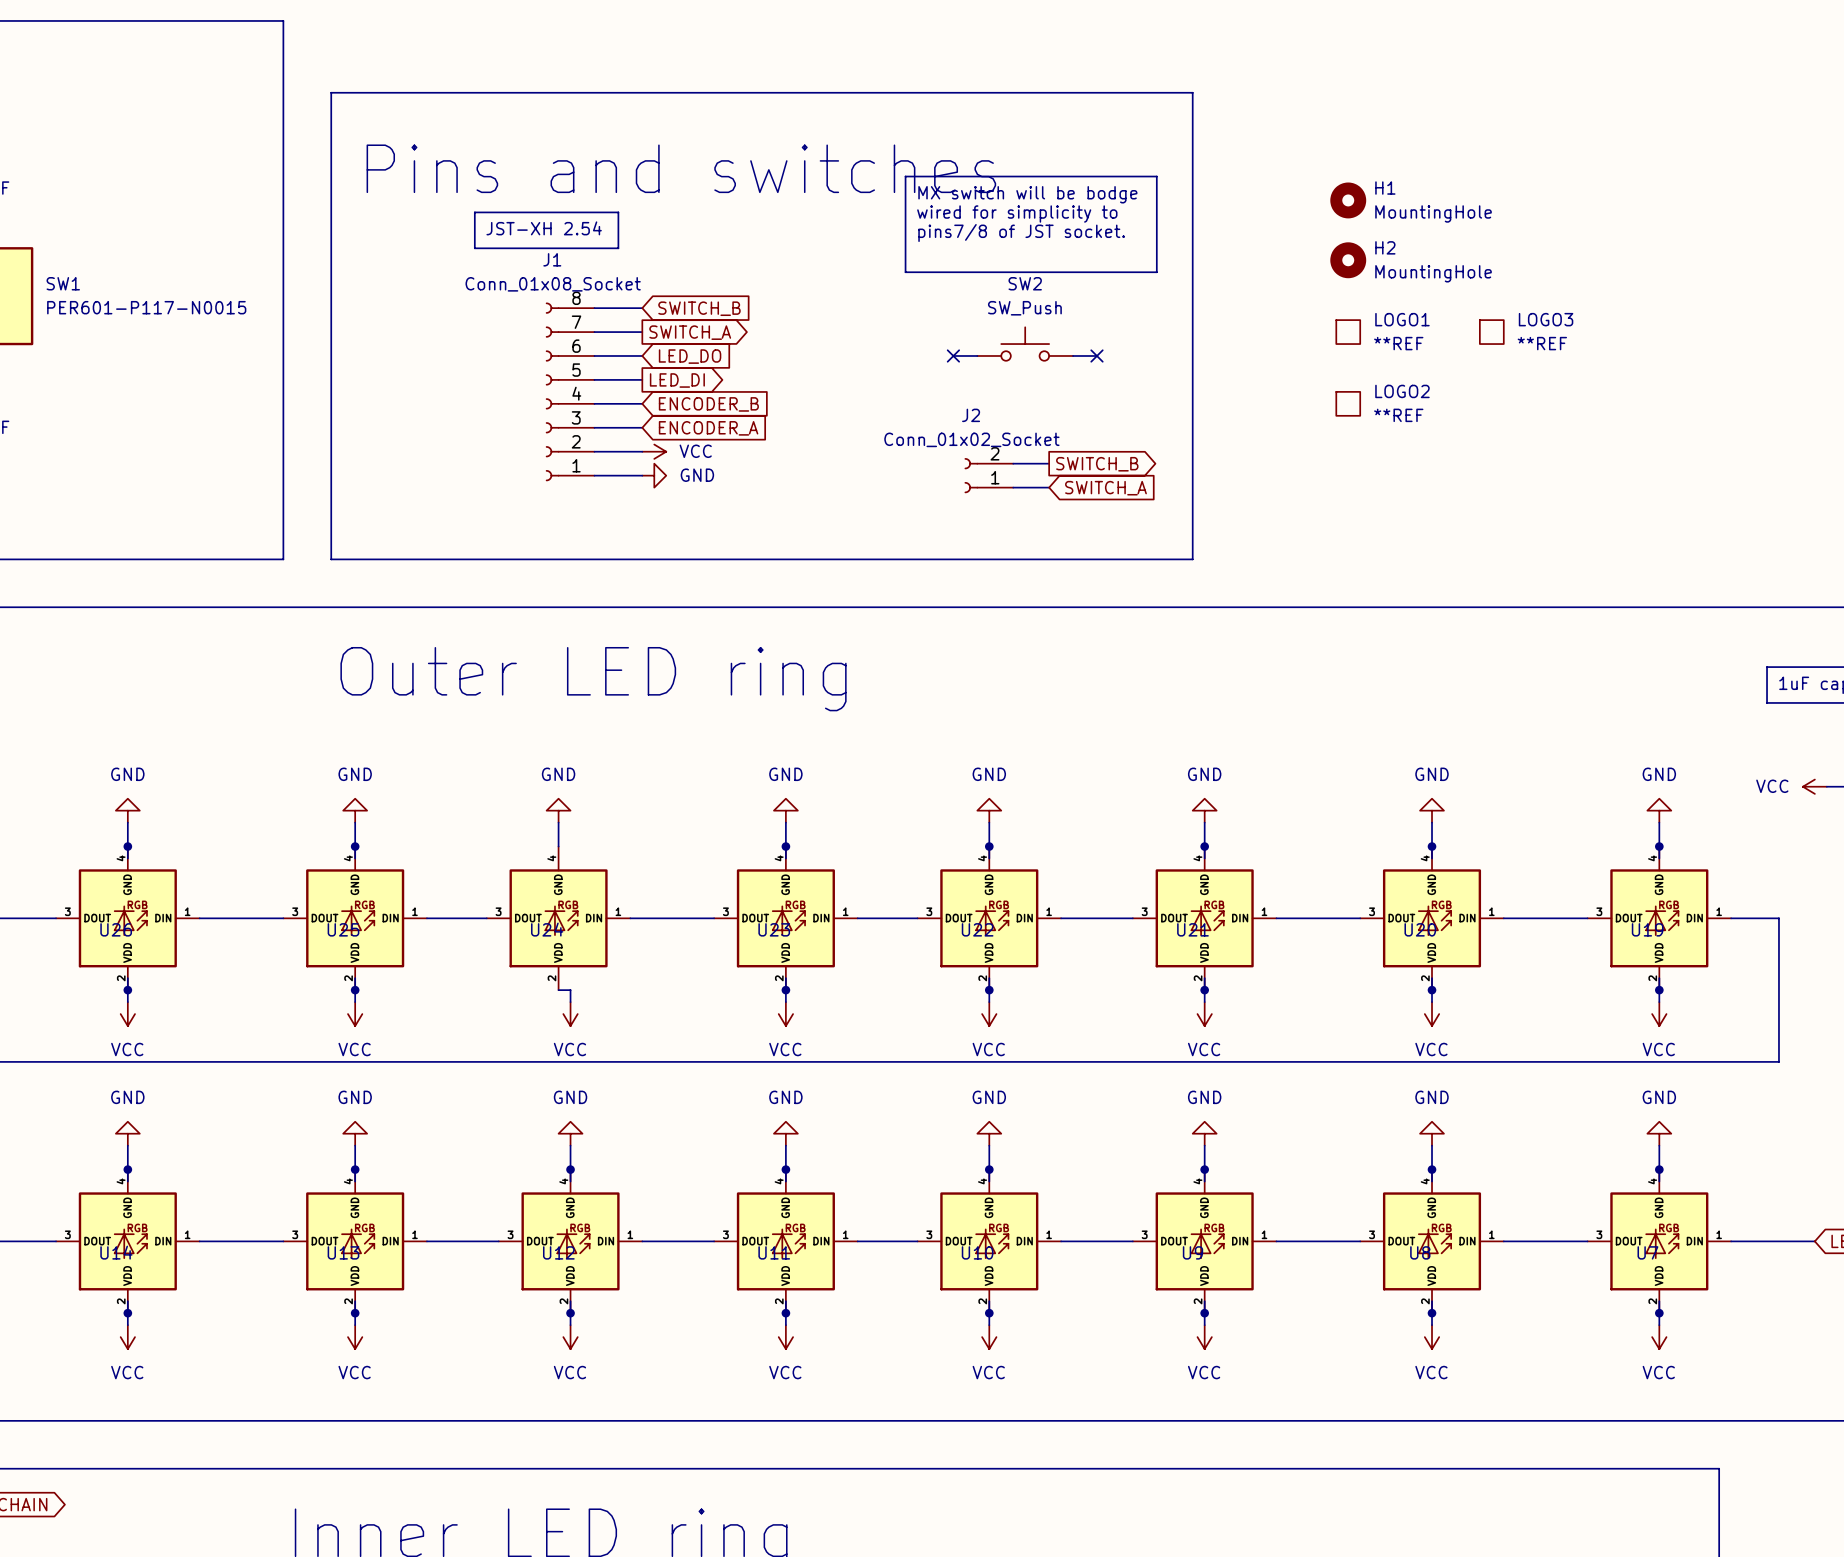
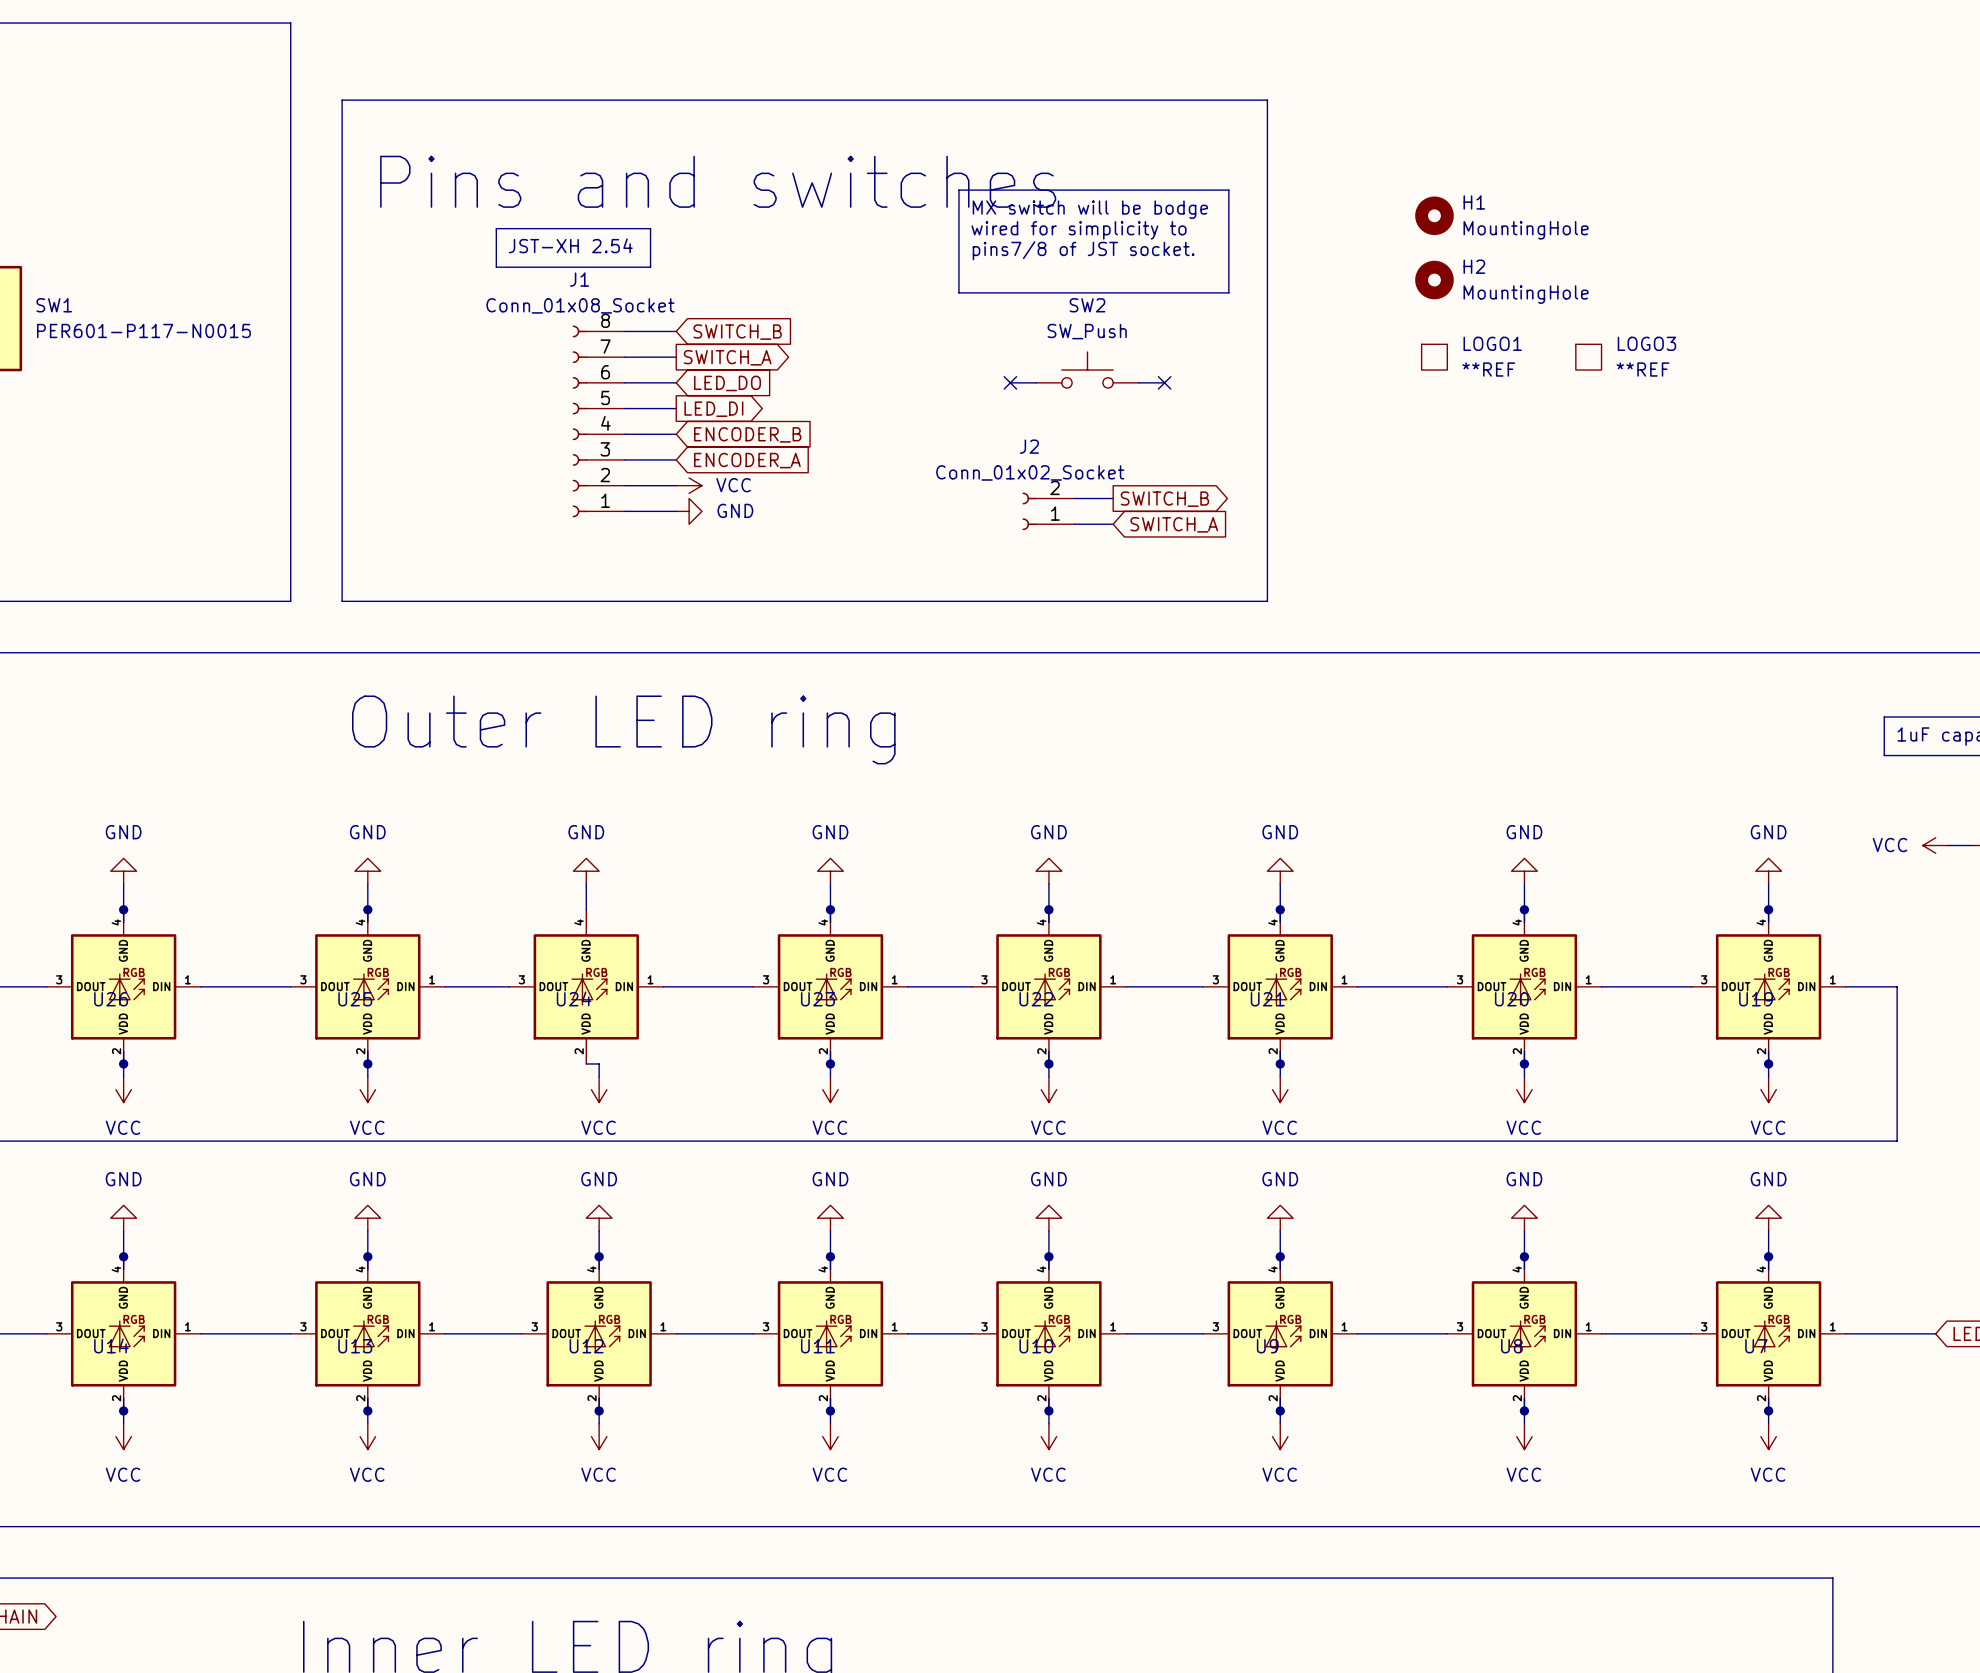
LOGO2: **REF (1348, 403) -> none

